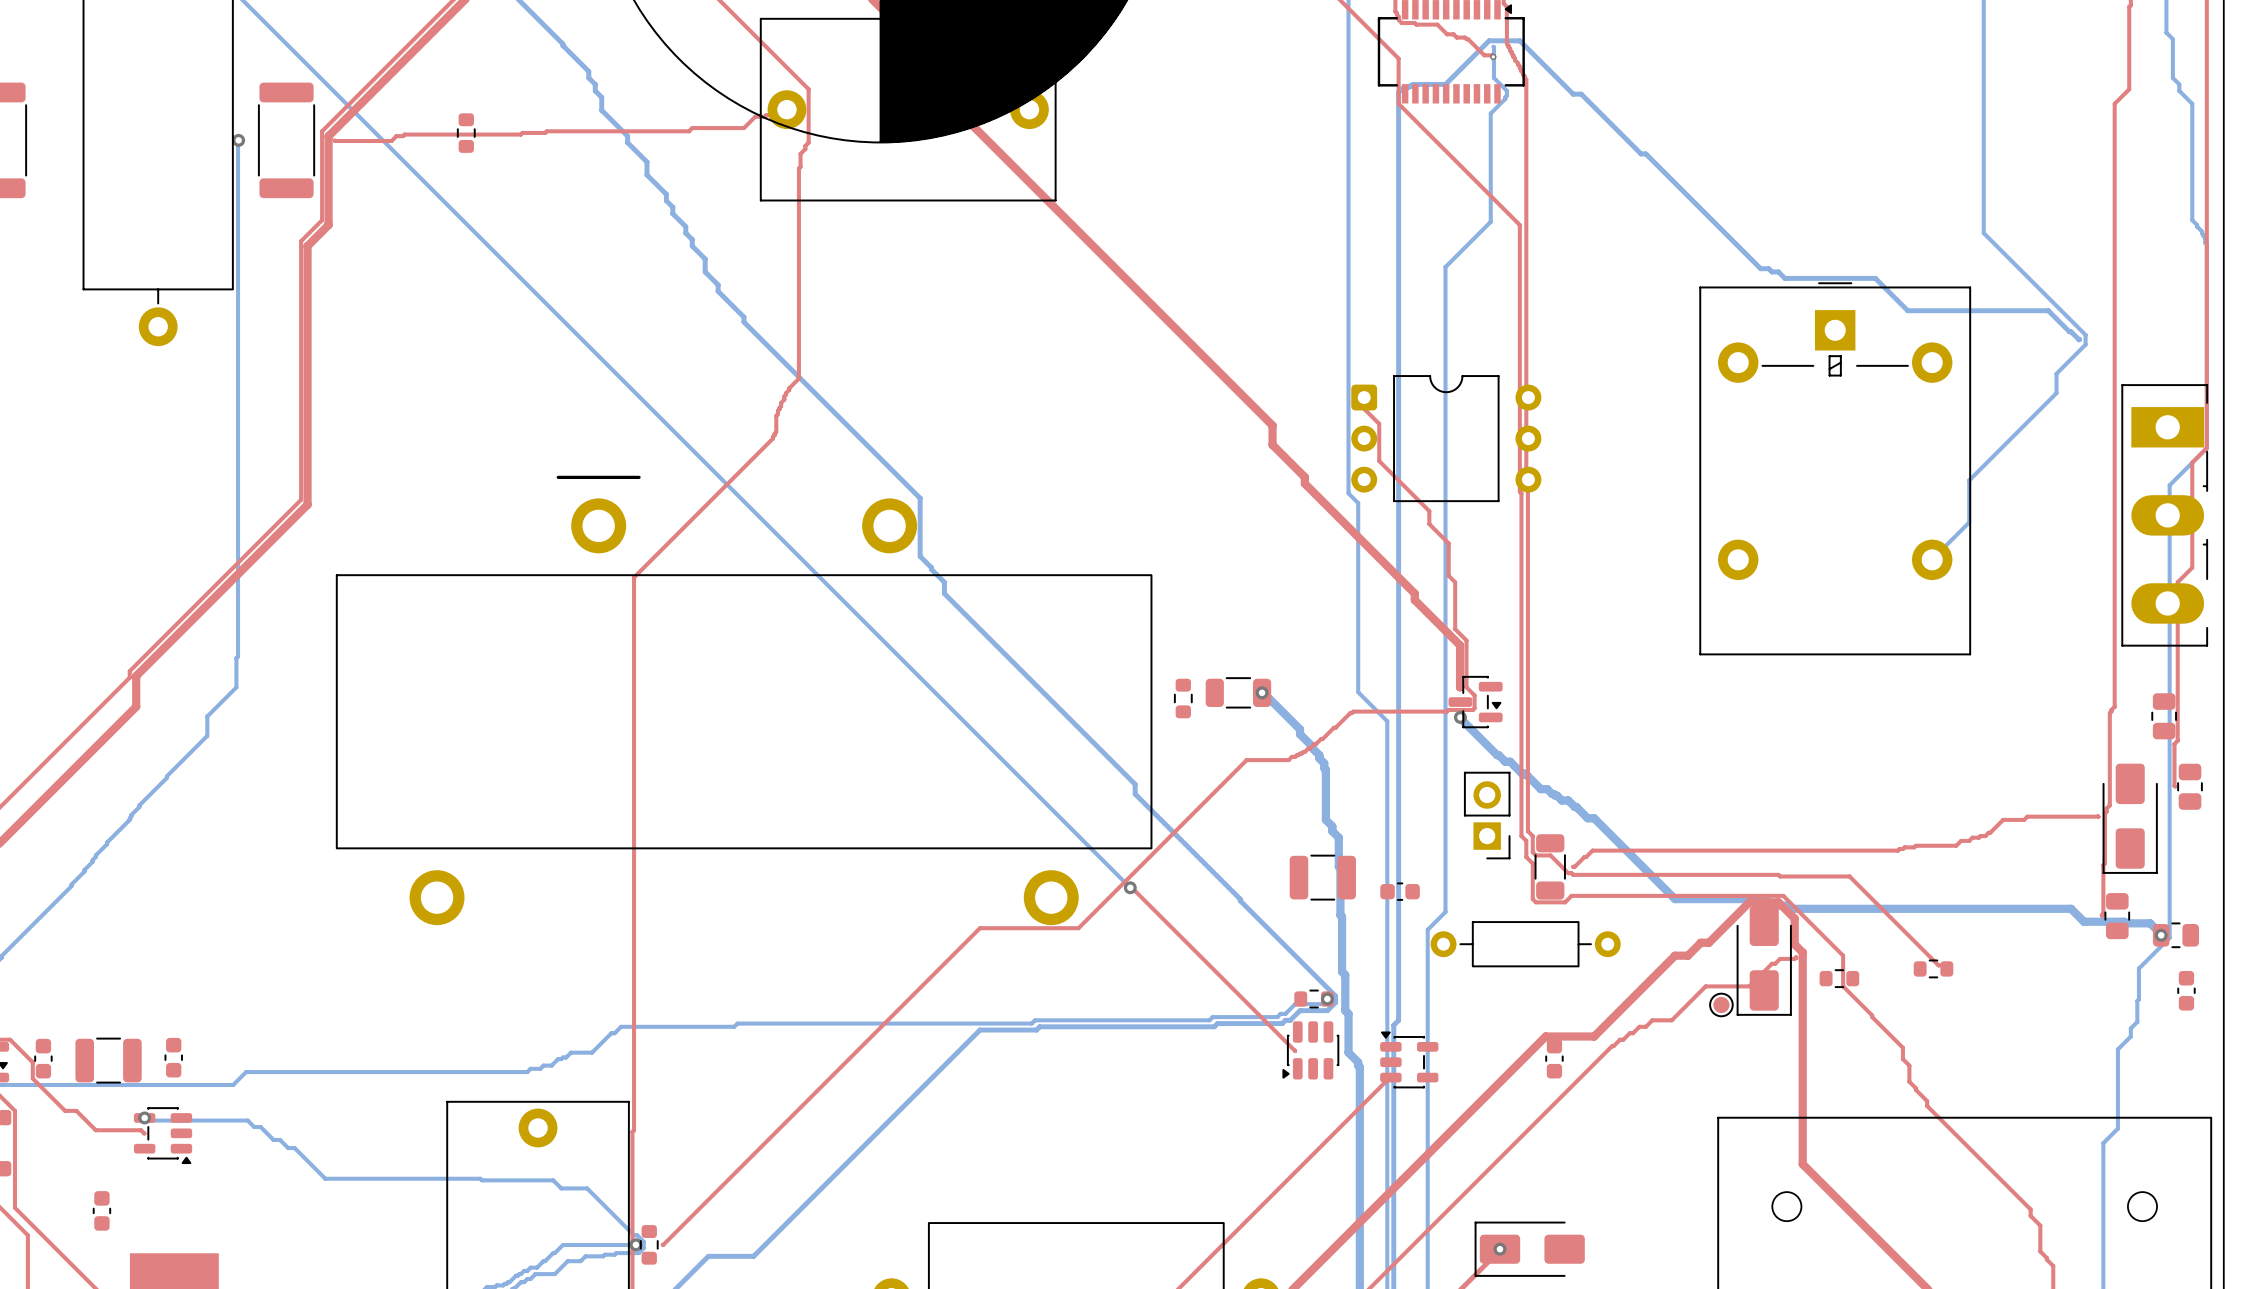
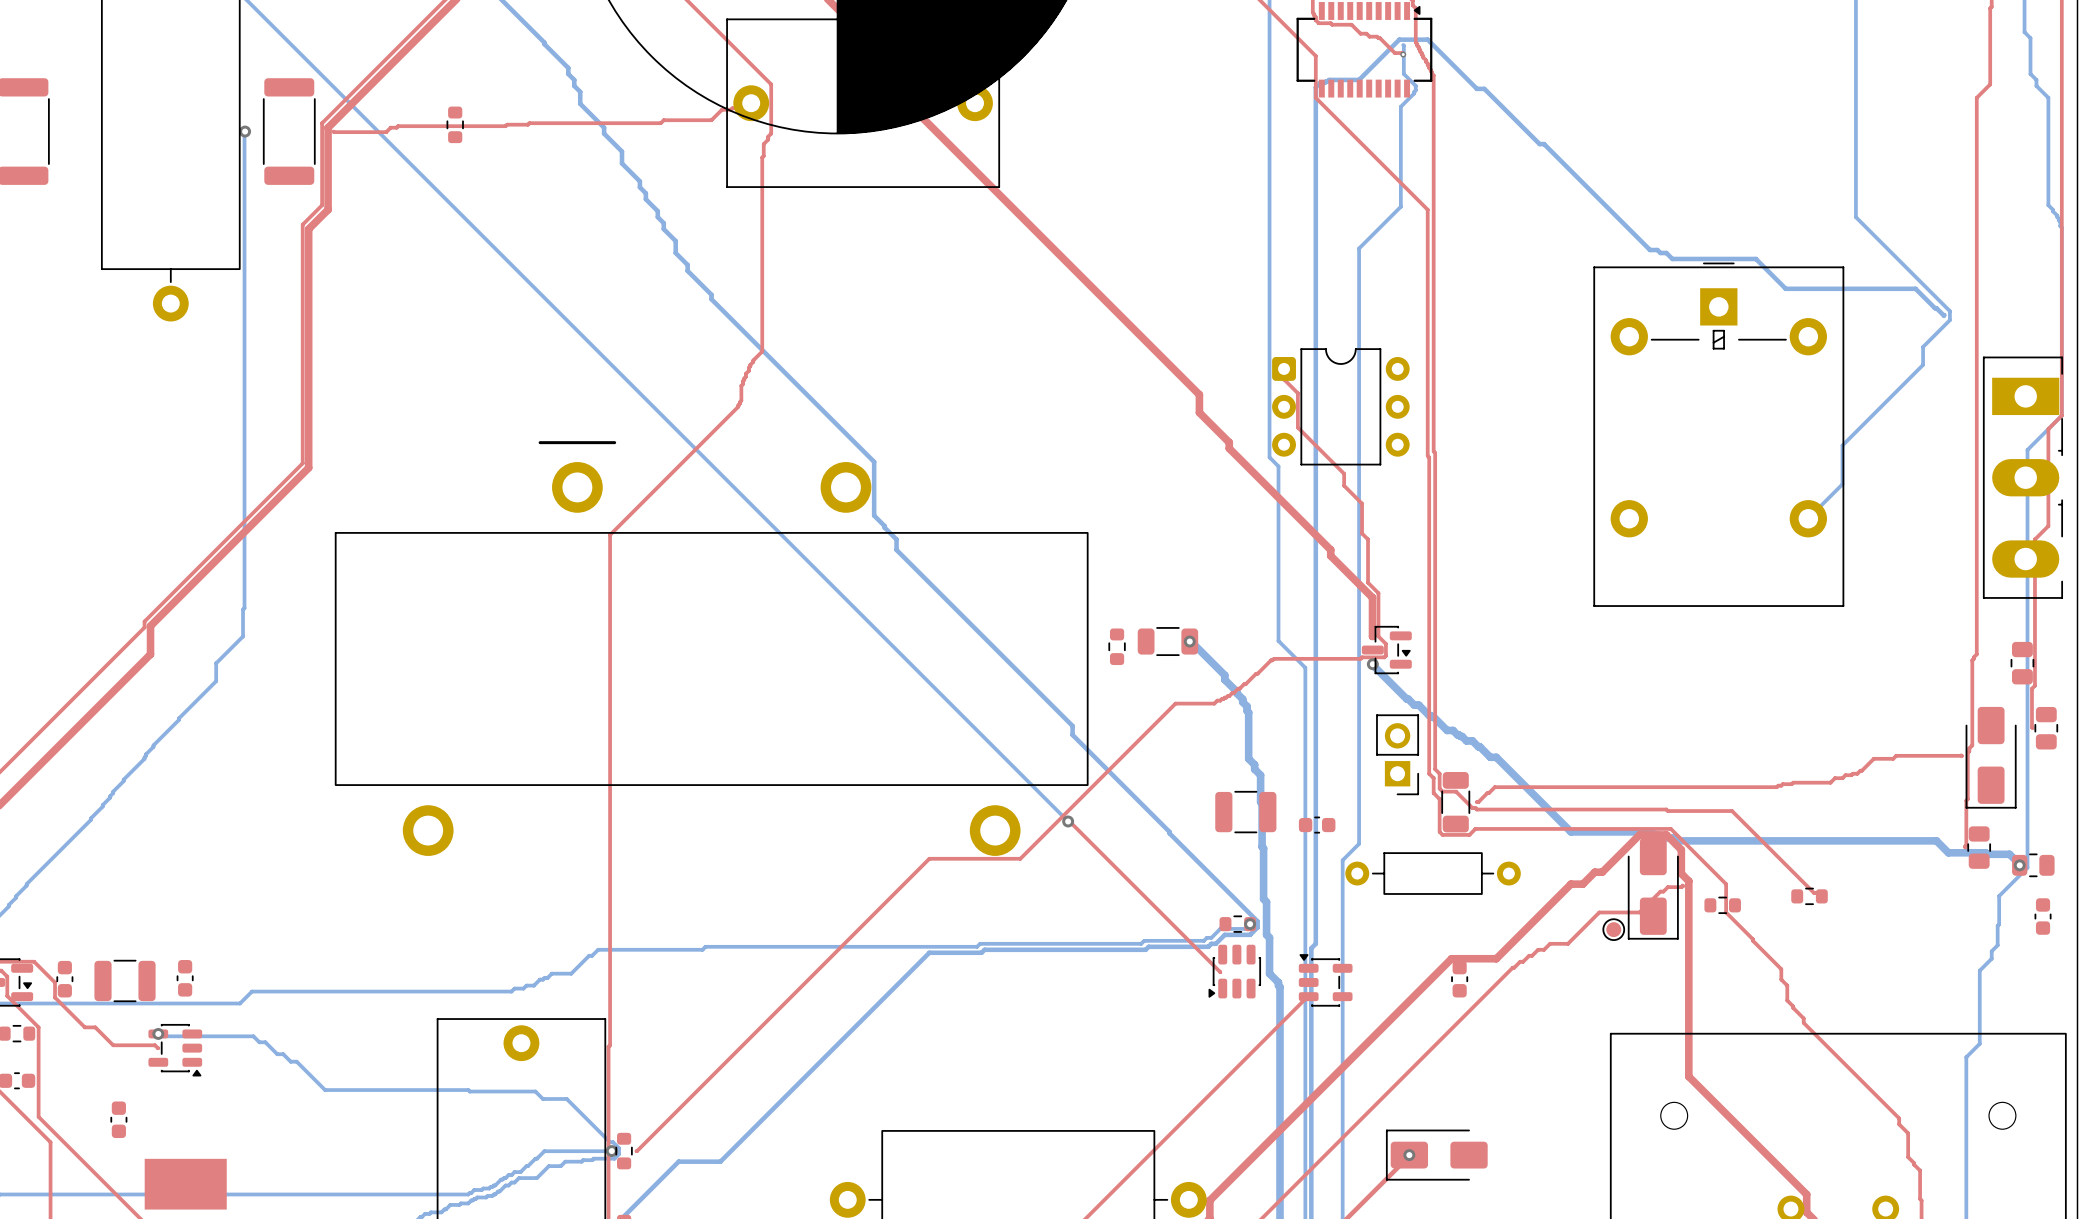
part: none -> (1340, 406)
part: (1446, 438) -> none

